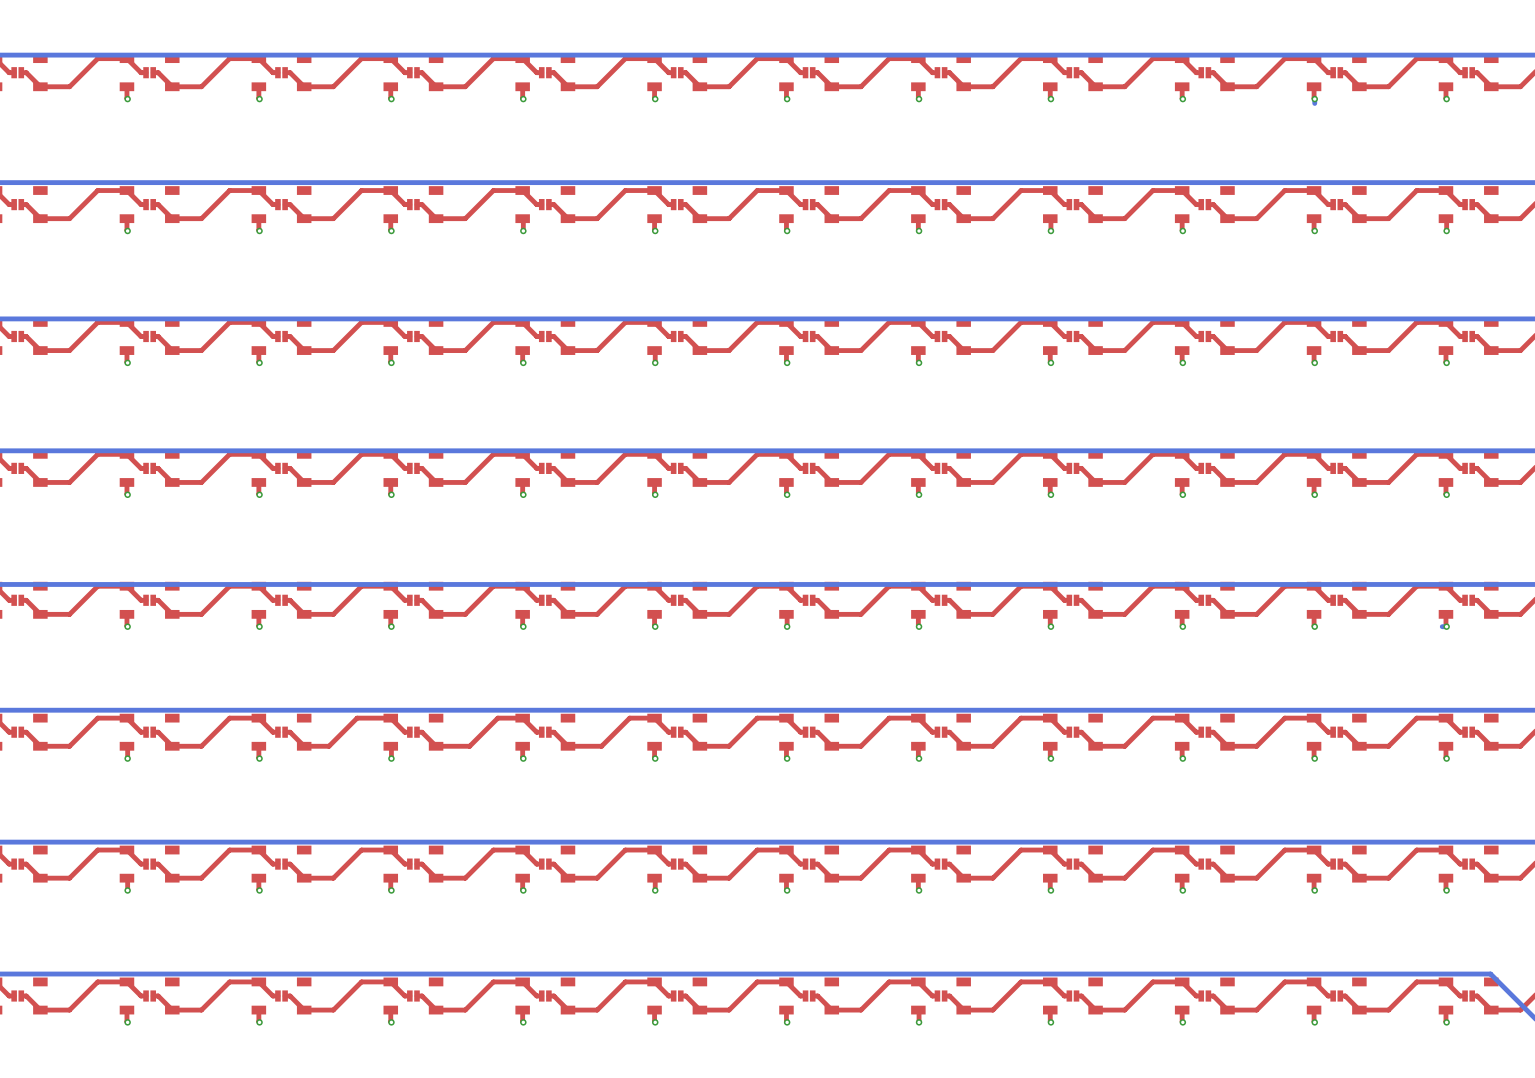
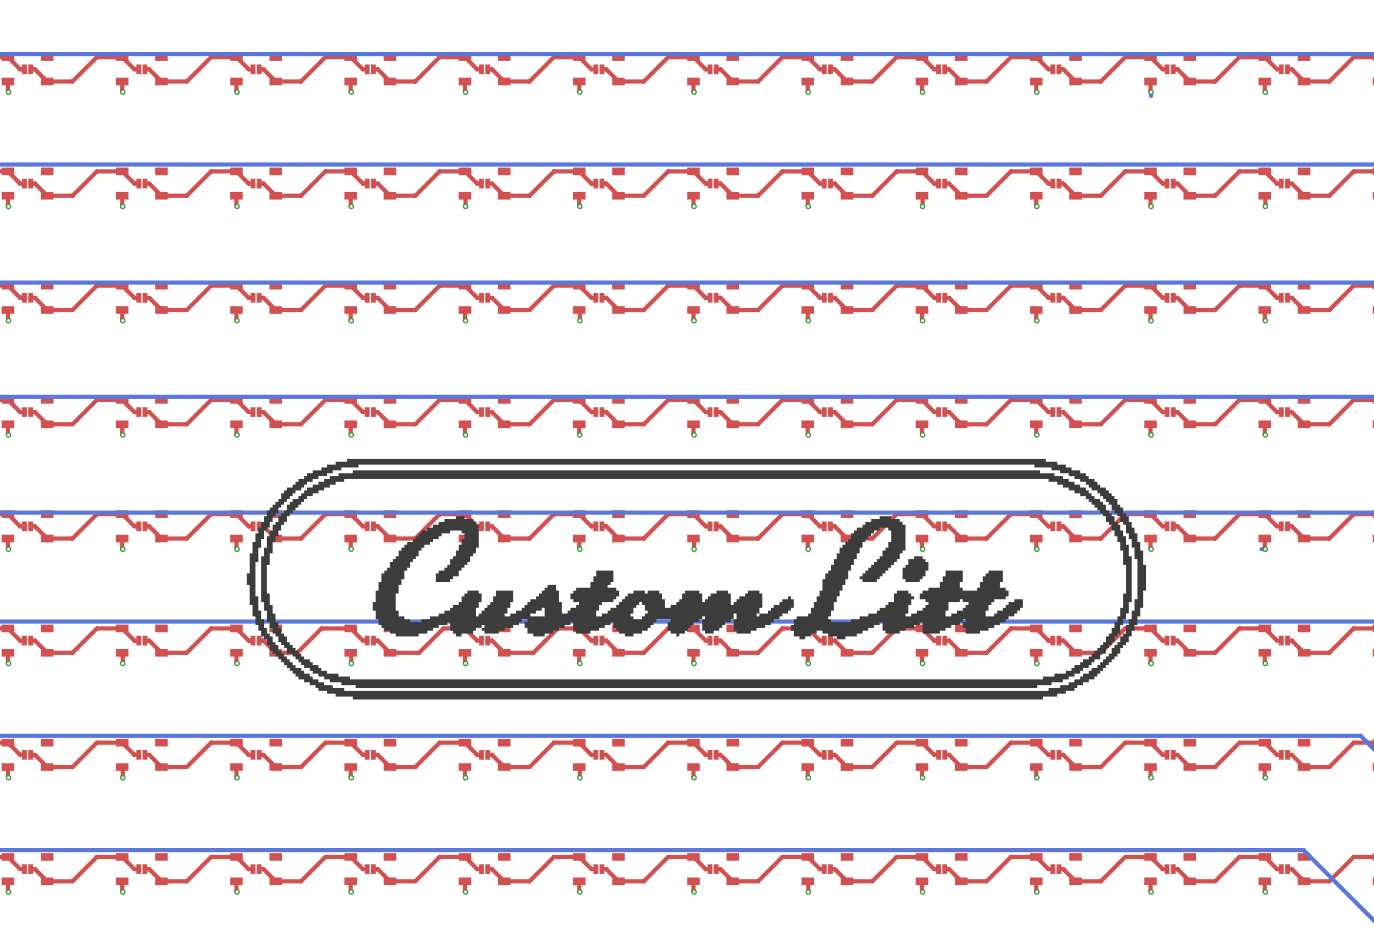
drawing: none -> [246, 458, 1147, 700]

